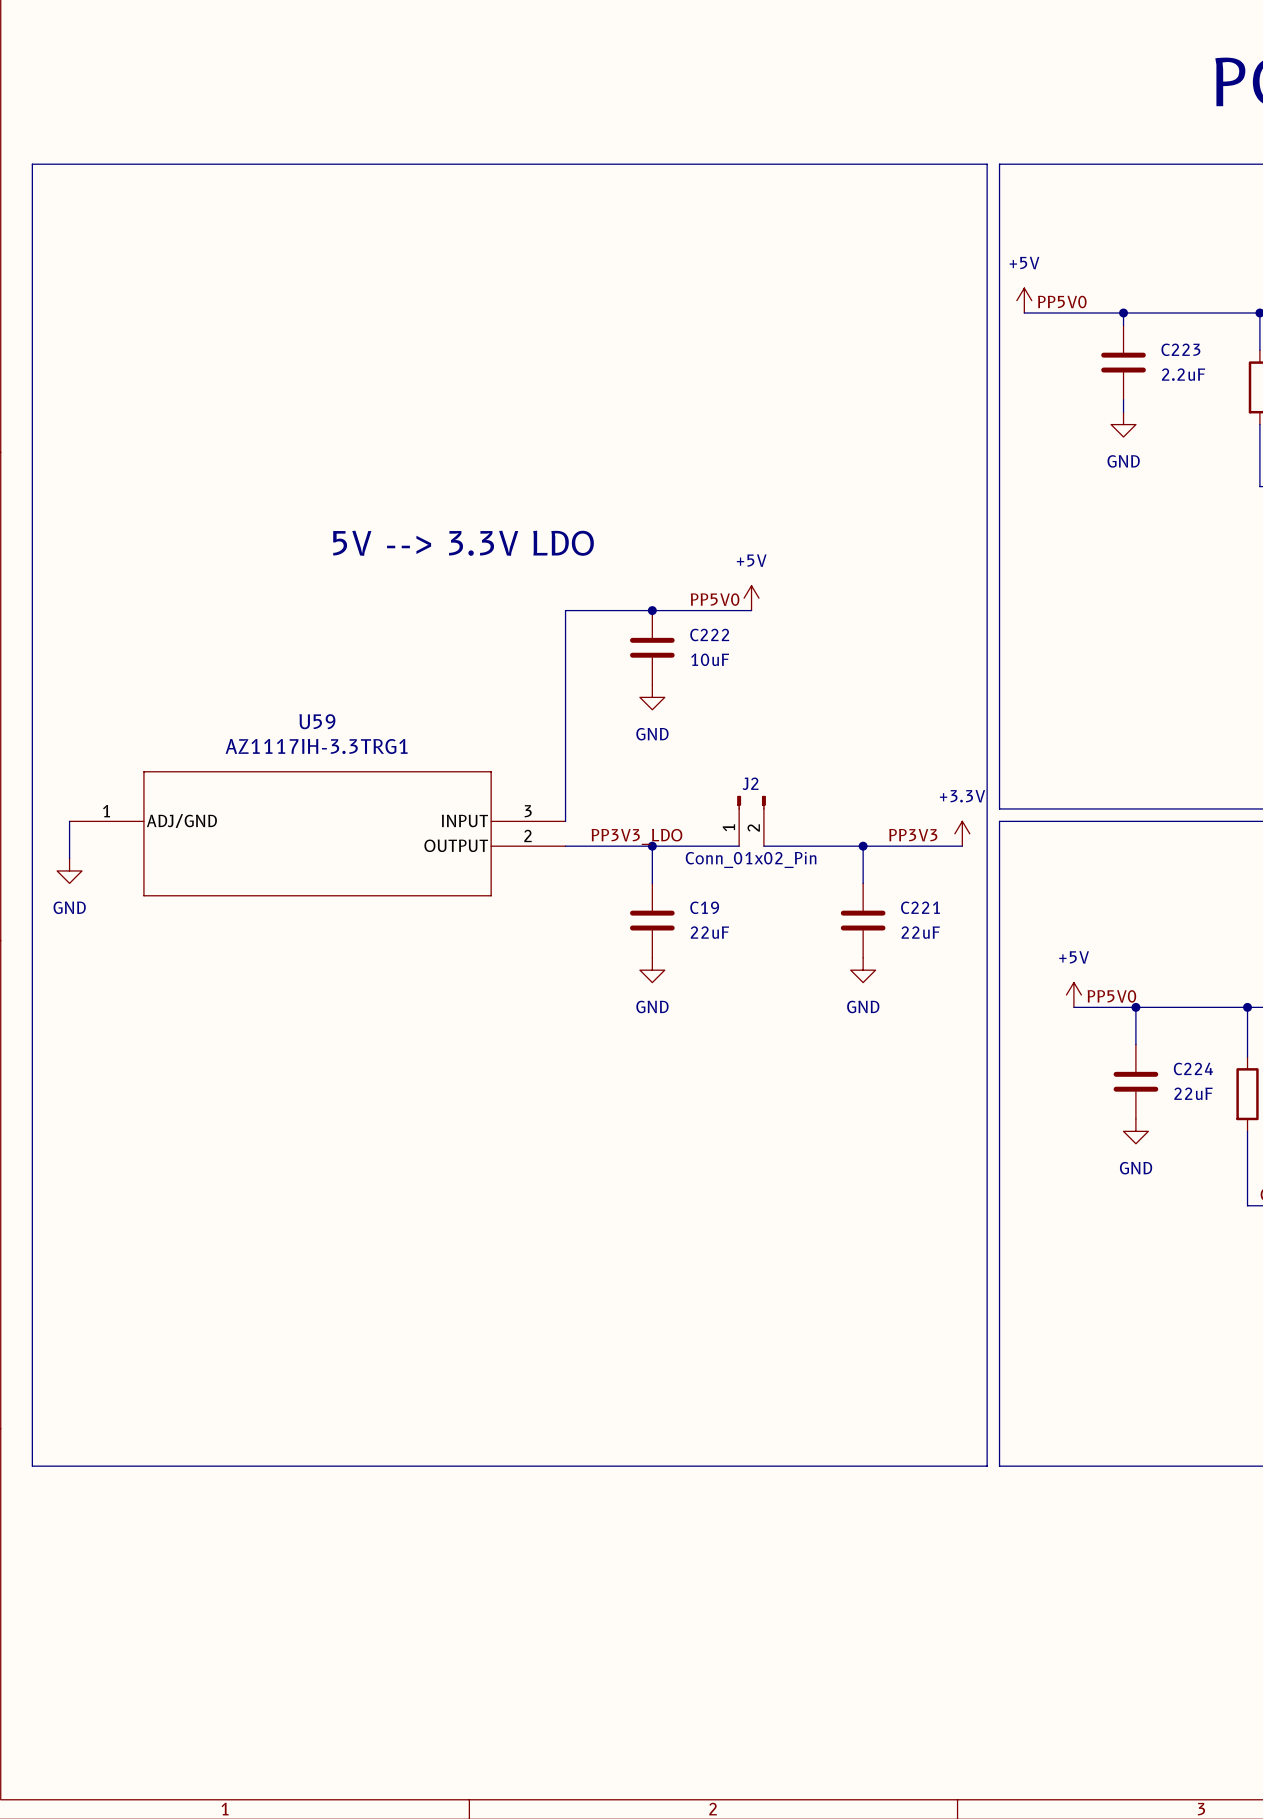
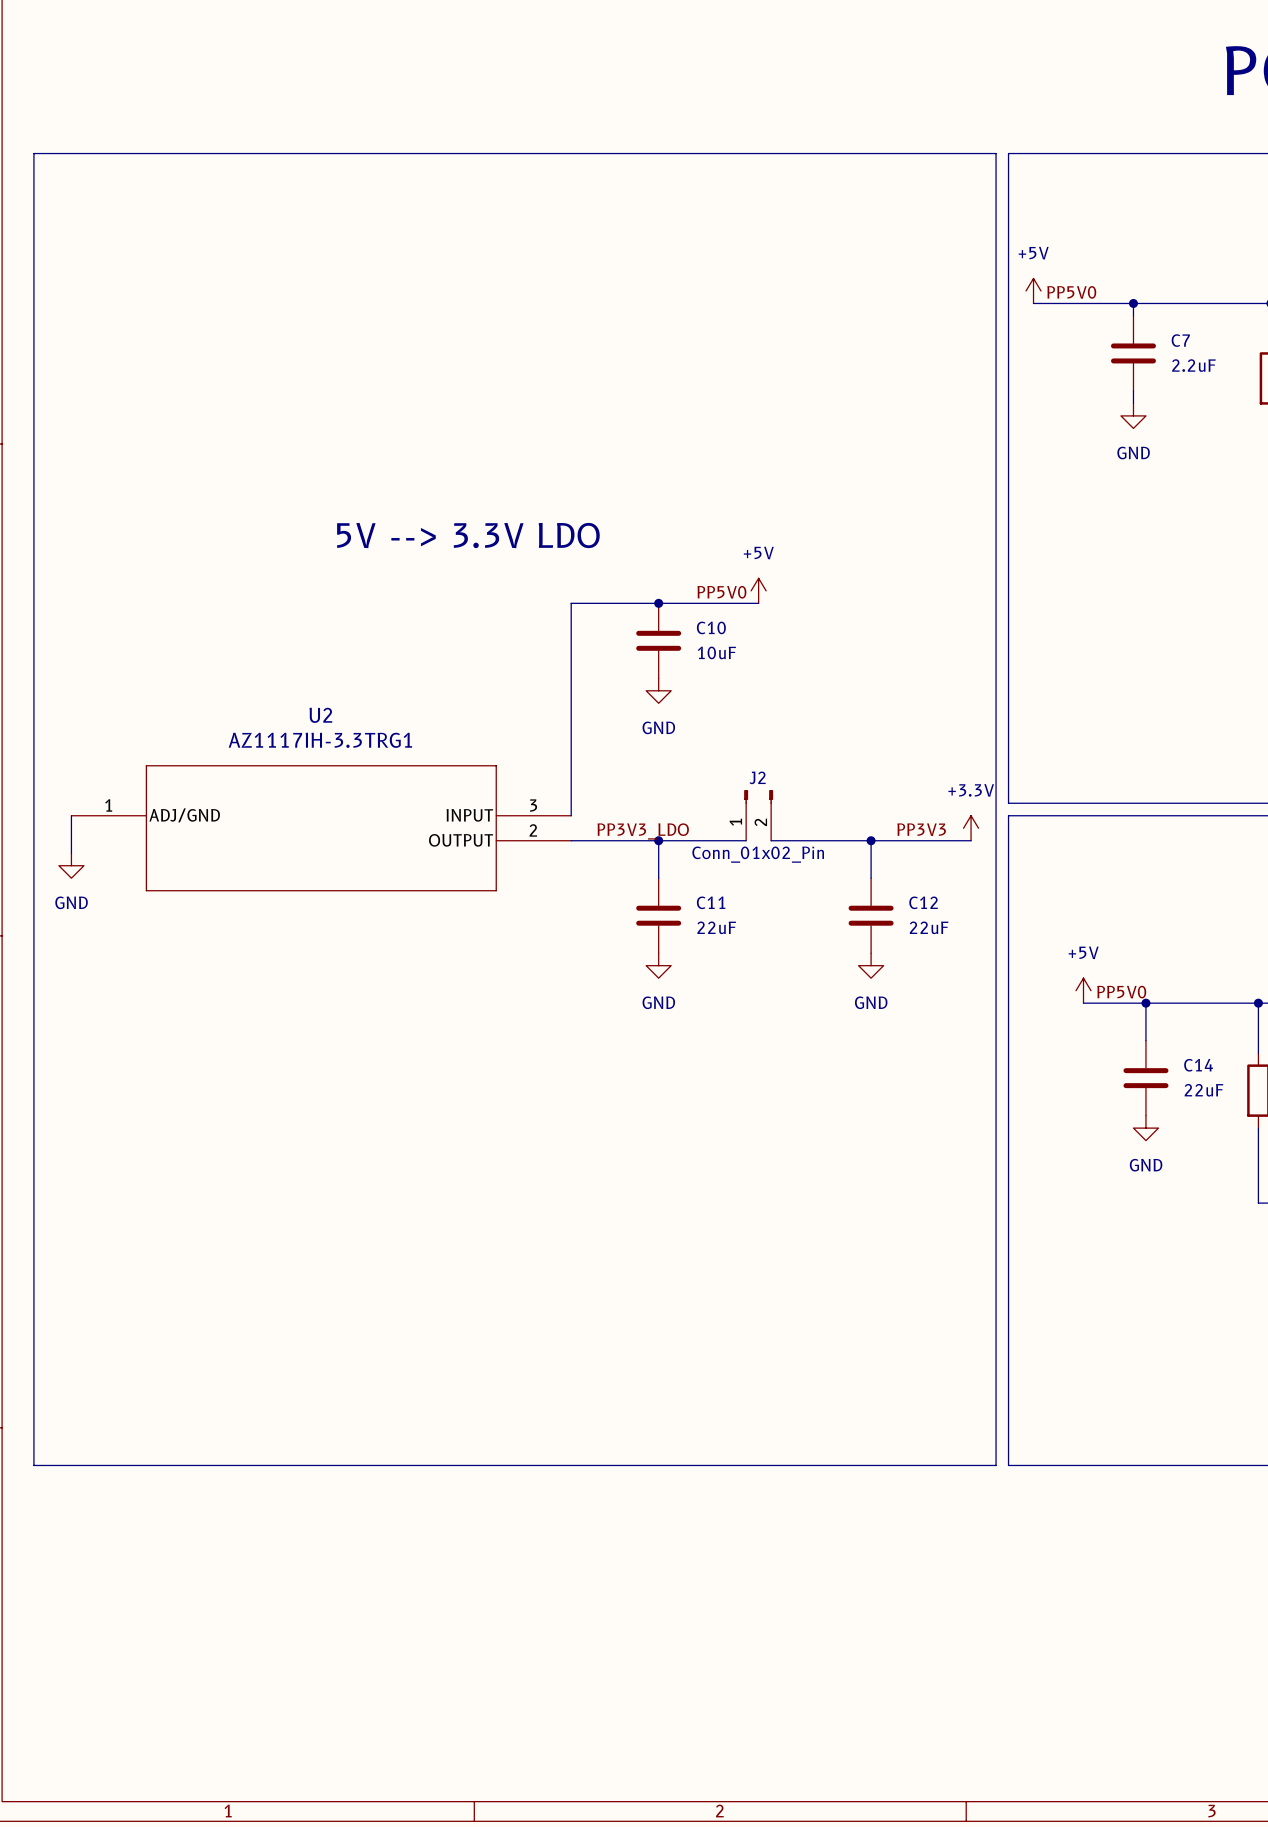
C223 name: C223 (1180, 349) -> C7 (1180, 340)
C222 name: C222 (709, 635) -> C10 (711, 627)
U59 name: U59 (317, 721) -> U2 (320, 715)
C19 name: C19 (704, 907) -> C11 (711, 902)
C221 name: C221 (920, 907) -> C12 (923, 902)
C224 name: C224 (1193, 1068) -> C14 (1198, 1065)

